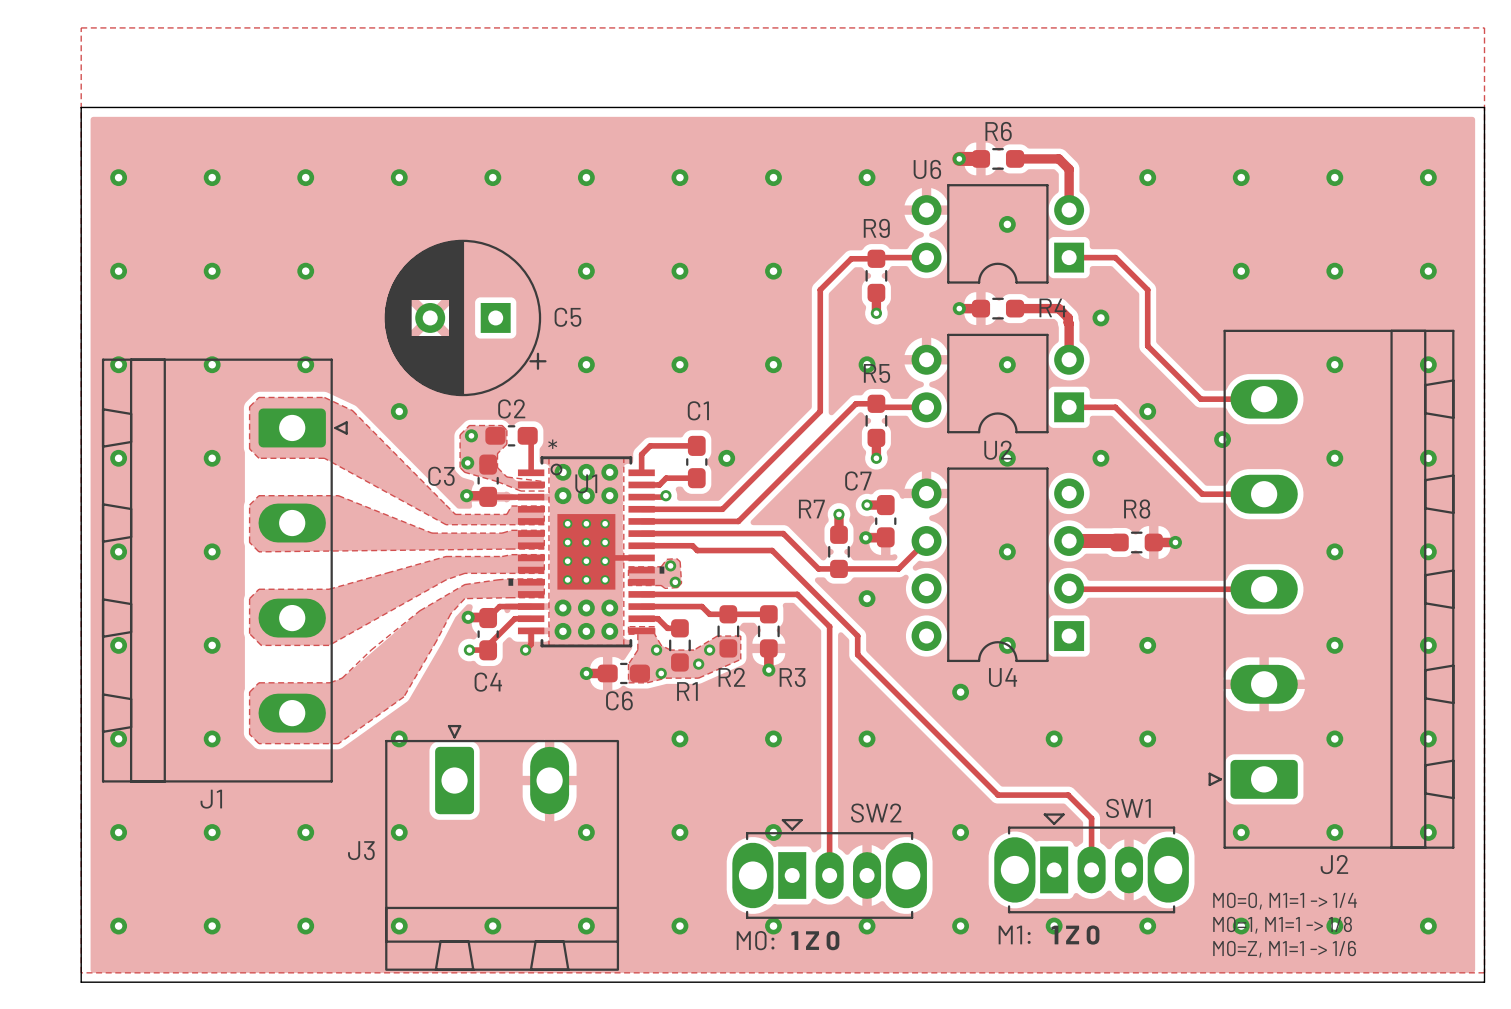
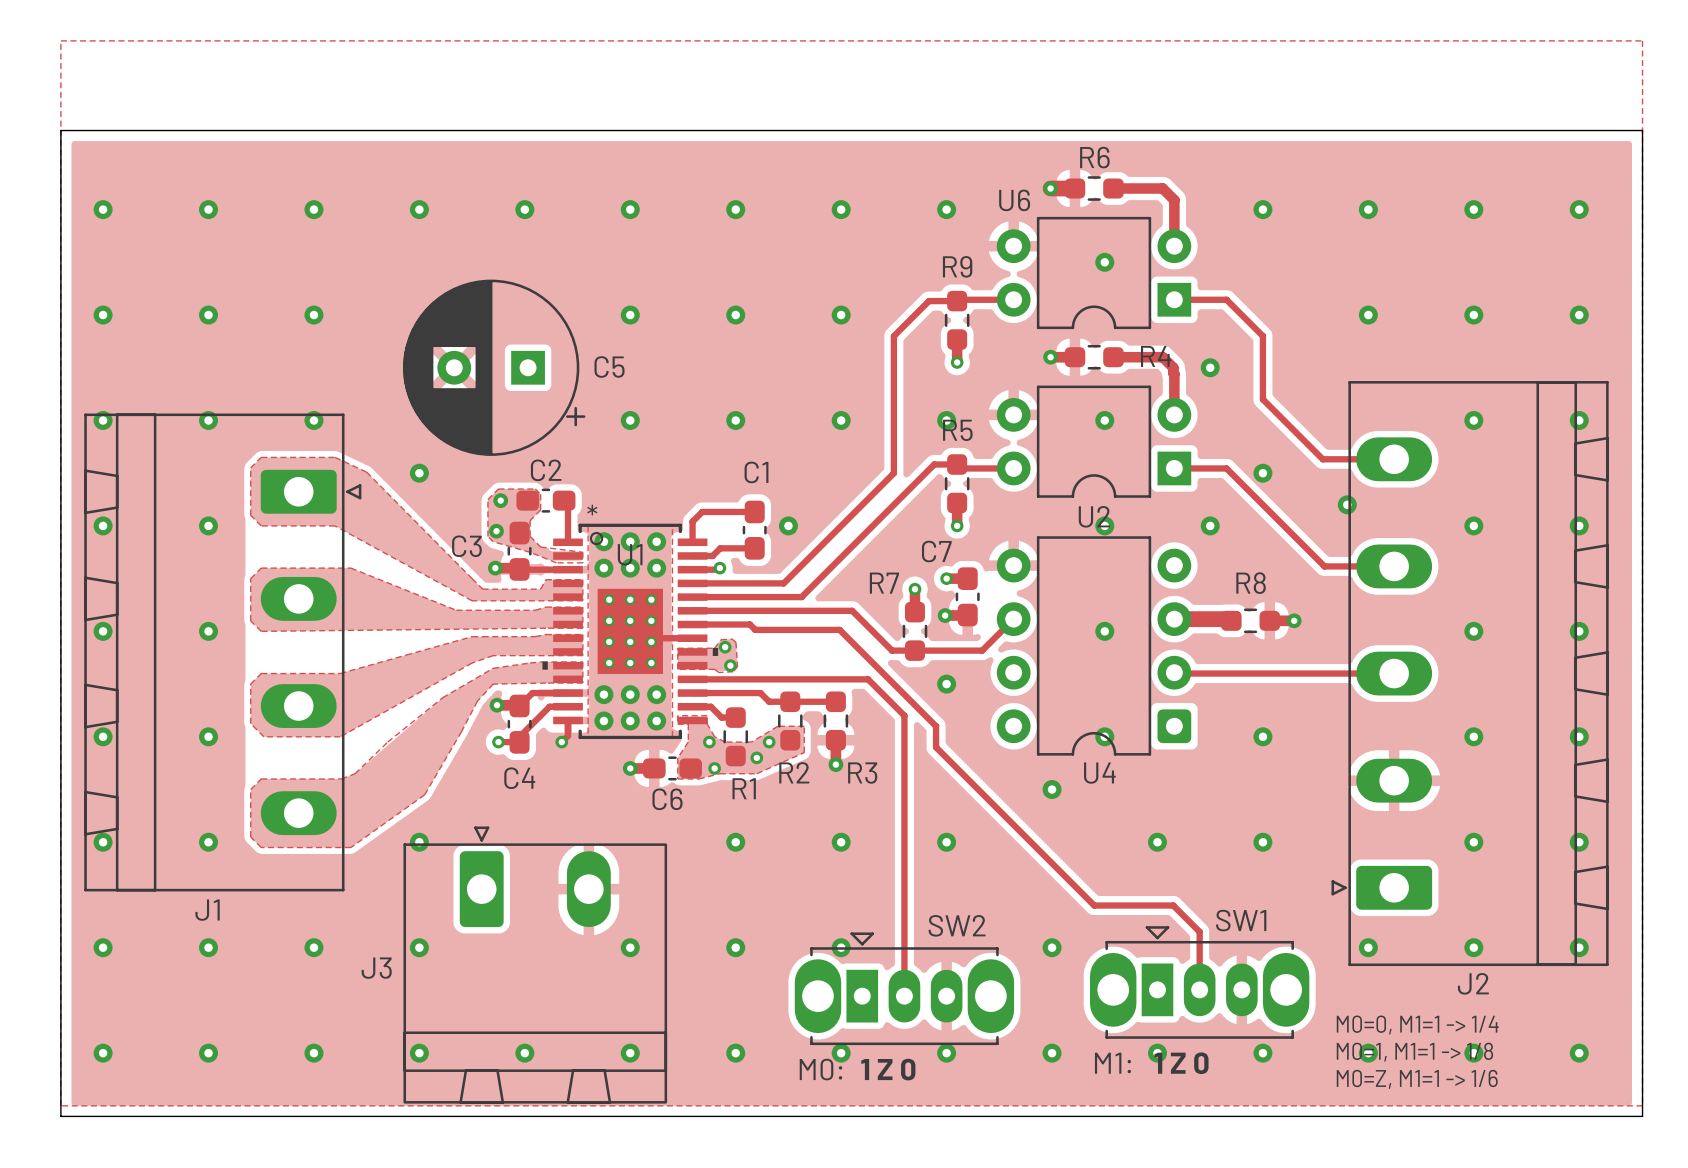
U4 footprint: [911, 467, 1085, 663] -> [996, 536, 1192, 756]

